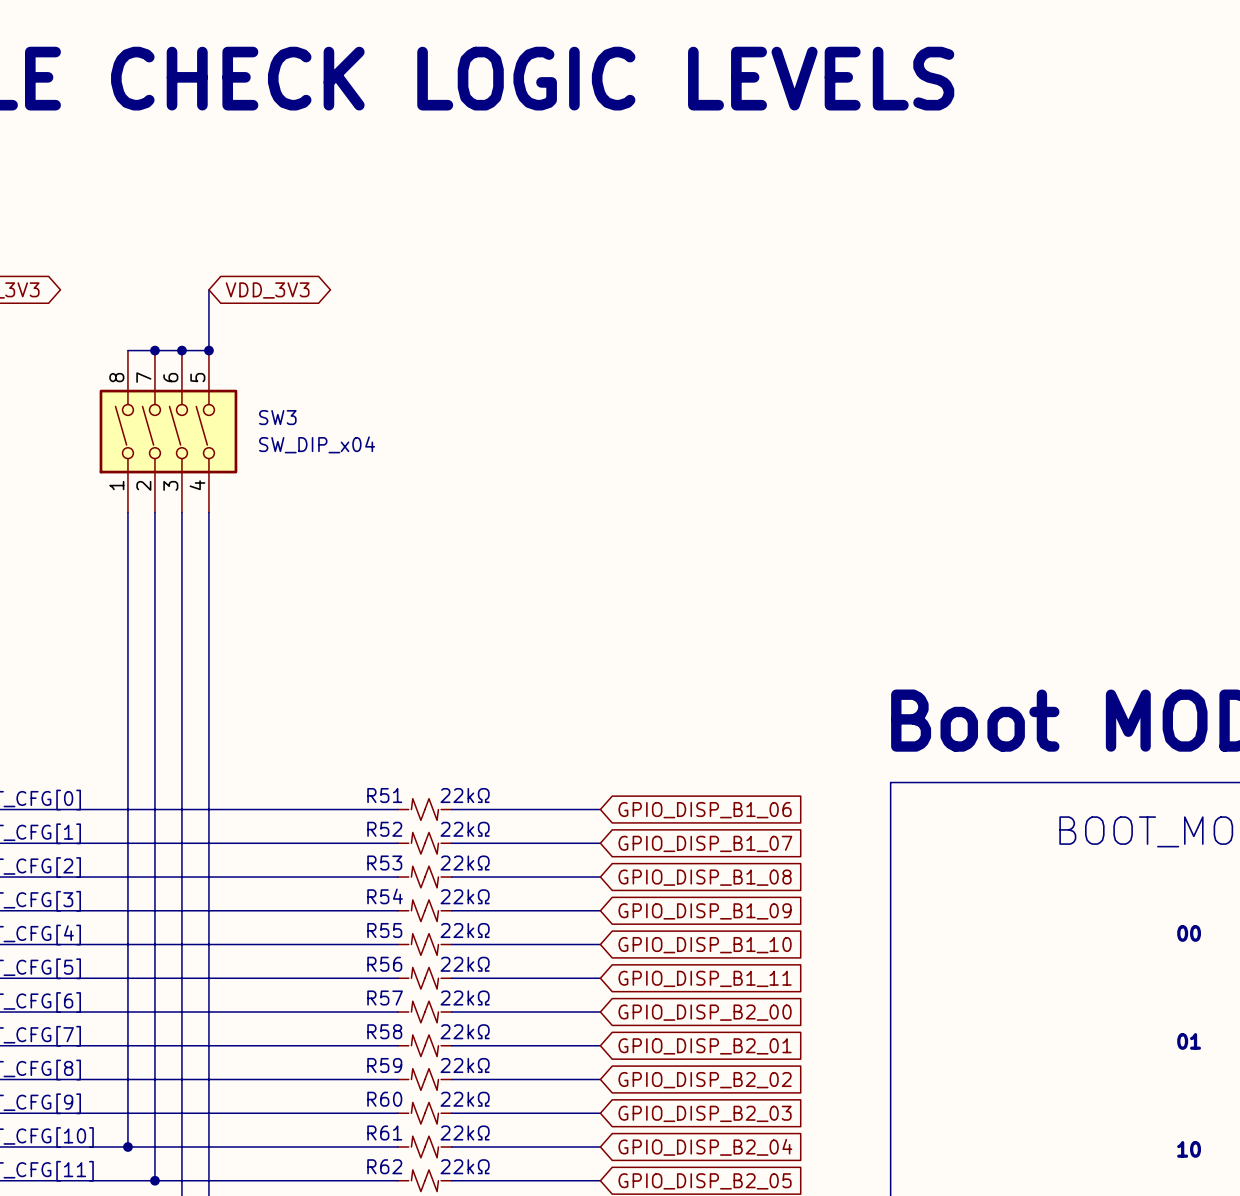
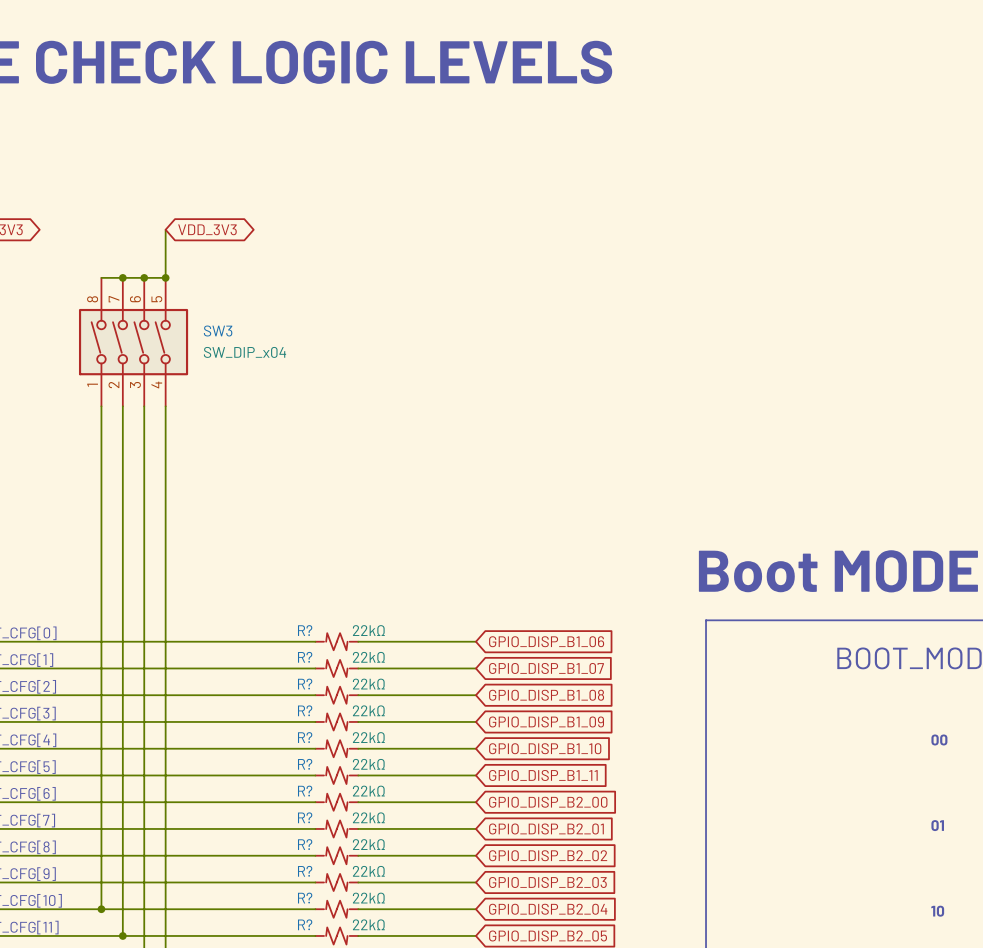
R51 name: R51 (384, 795) -> R? (305, 630)
R52 name: R52 (384, 829) -> R? (305, 657)
R53 name: R53 (384, 863) -> R? (305, 684)
R54 name: R54 (385, 896) -> R? (305, 710)
R55 name: R55 (384, 930) -> R? (305, 737)
R56 name: R56 (384, 964) -> R? (305, 764)
R57 name: R57 (385, 998) -> R? (305, 791)
R58 name: R58 (384, 1031) -> R? (305, 817)
R59 name: R59 (384, 1065) -> R? (305, 844)
R60 name: R60 (384, 1099) -> R? (305, 871)
R61 name: R61 (384, 1132) -> R? (305, 898)
R62 name: R62 (384, 1166) -> R? (305, 924)

